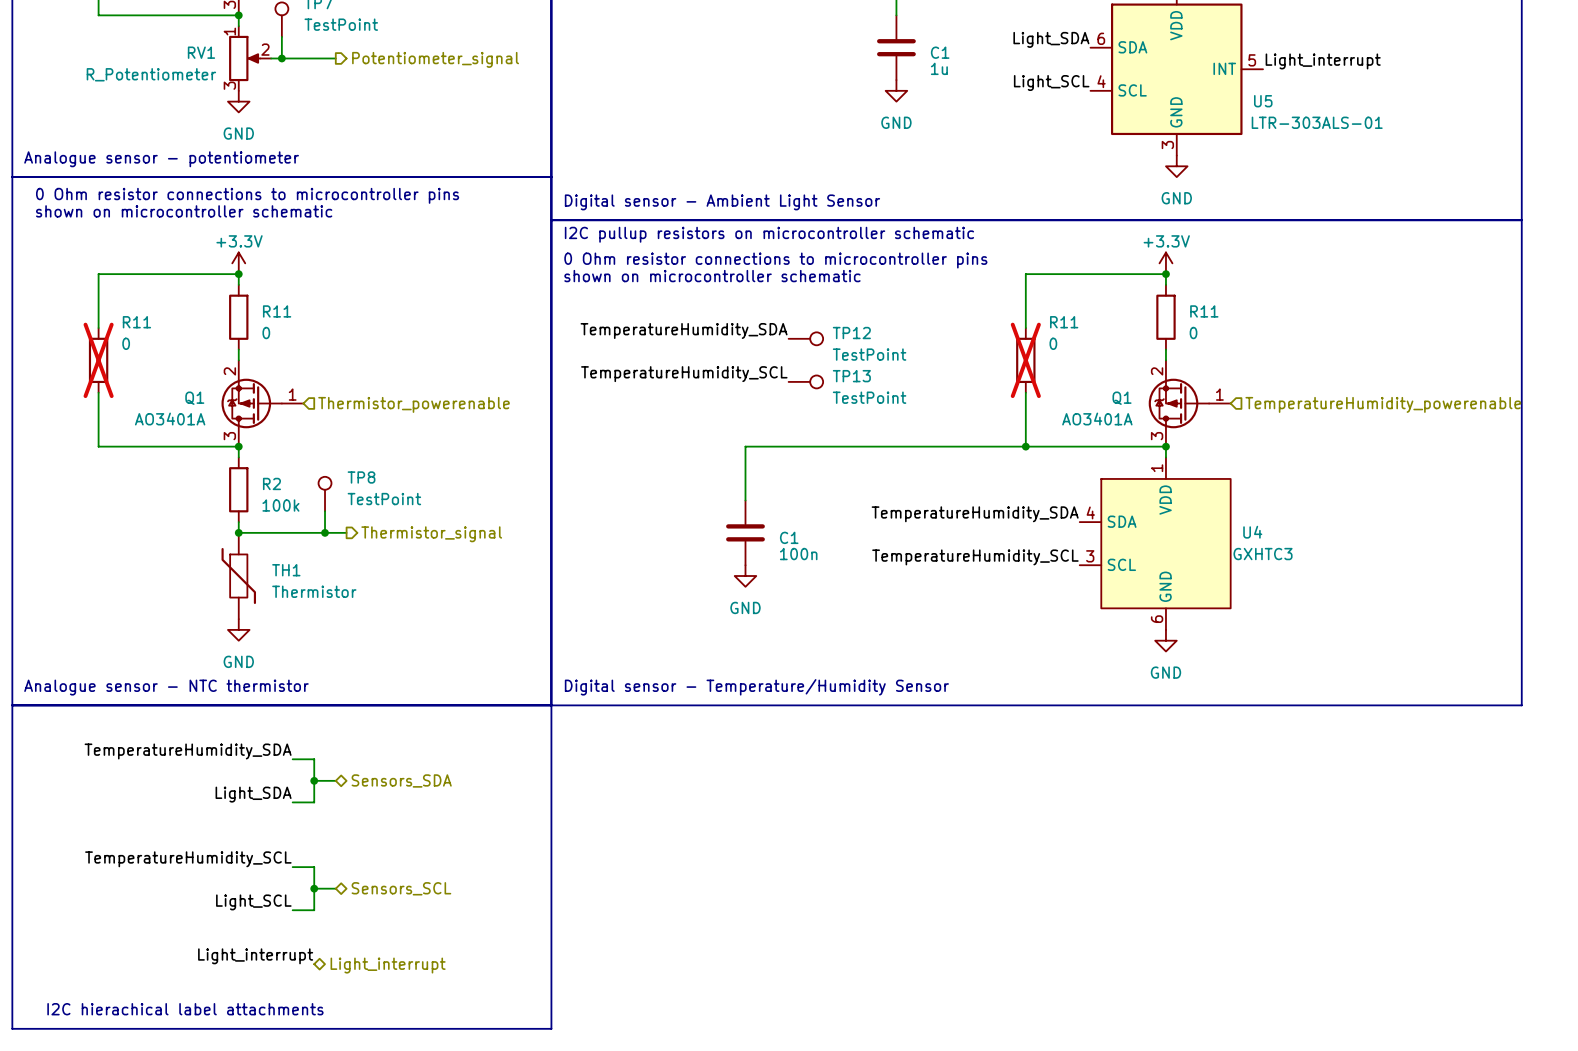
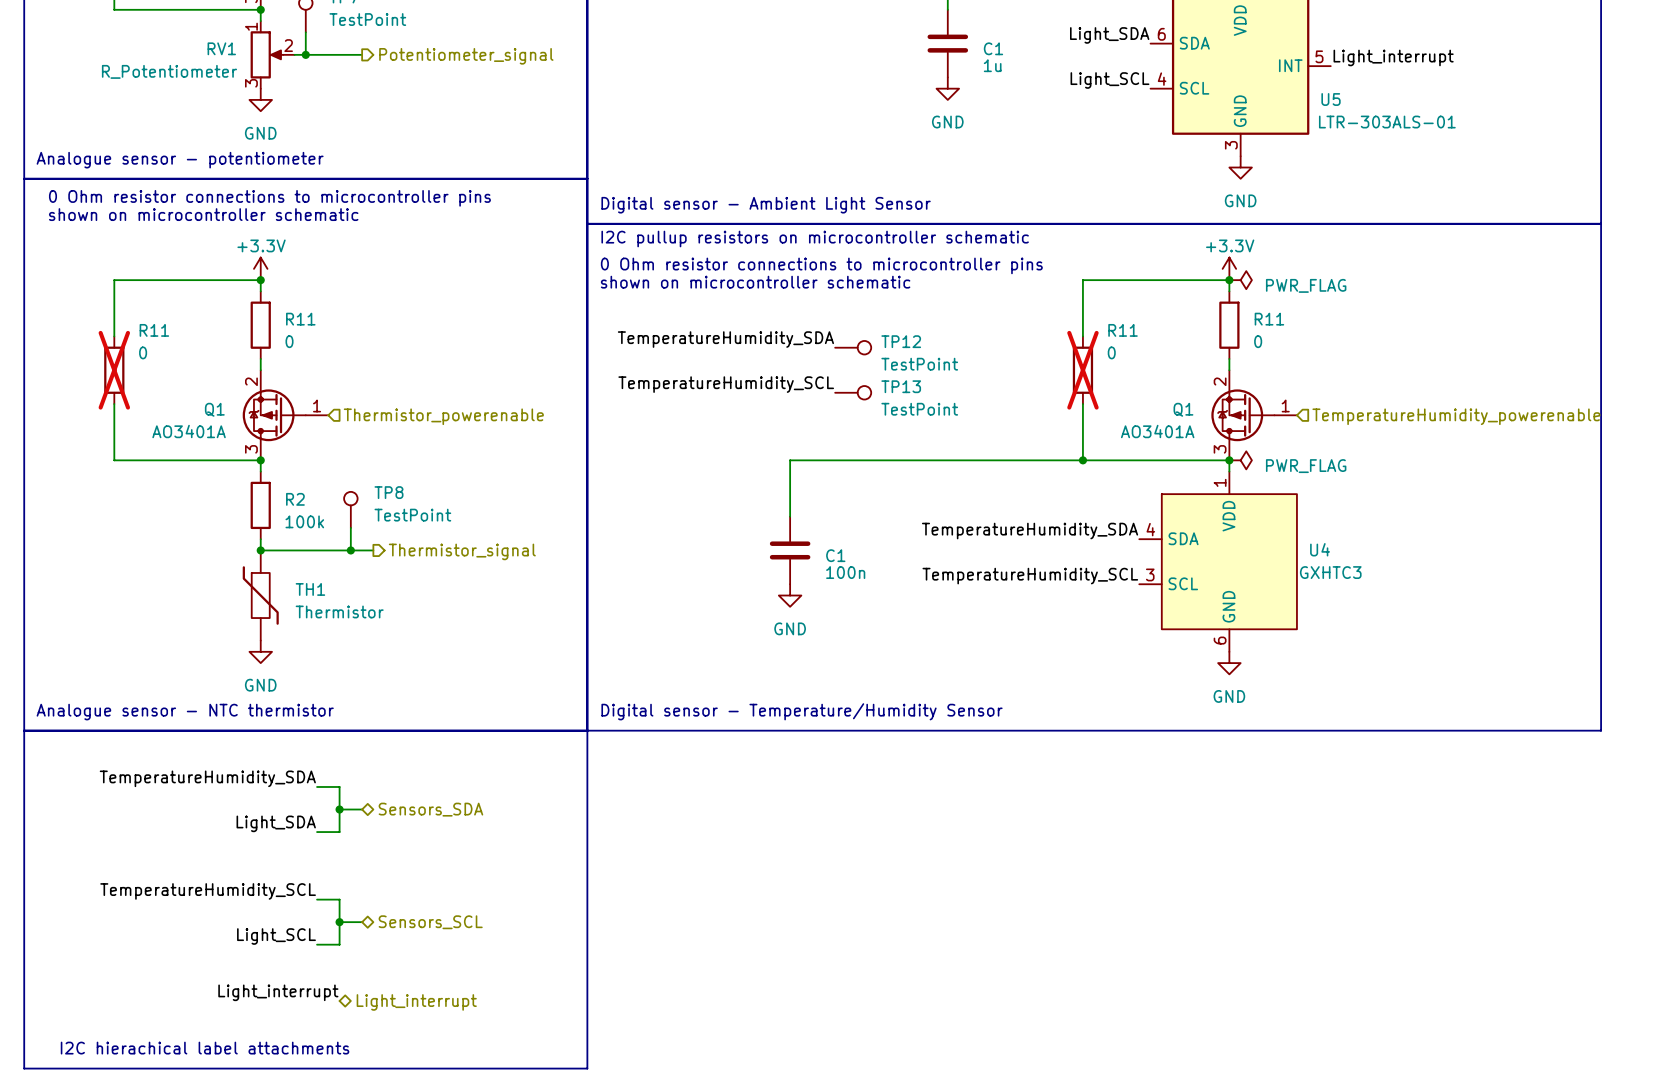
power symbol: none -> PWR_FLAG (1240, 280)
power symbol: none -> PWR_FLAG (1240, 460)

